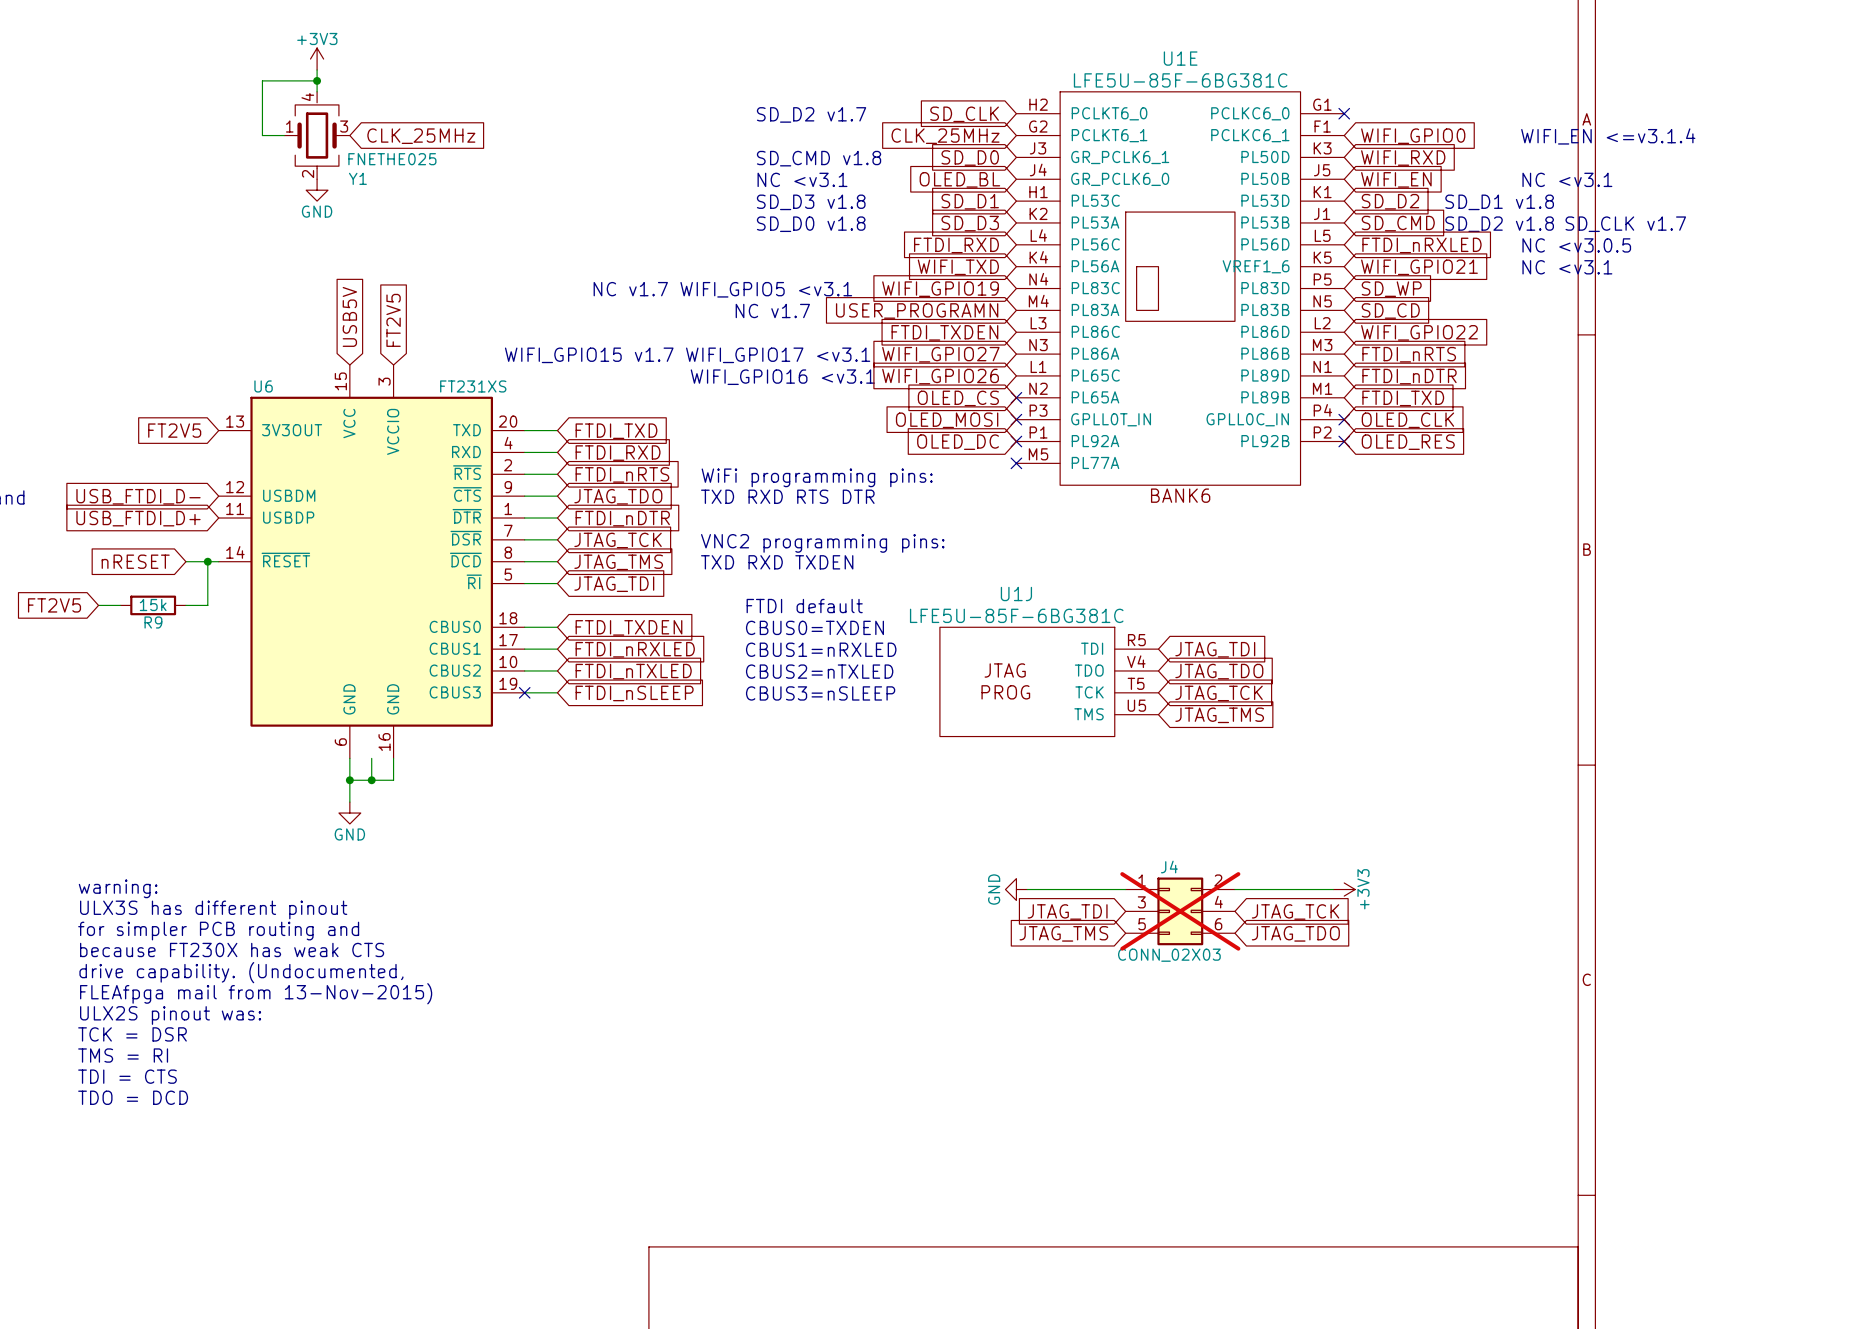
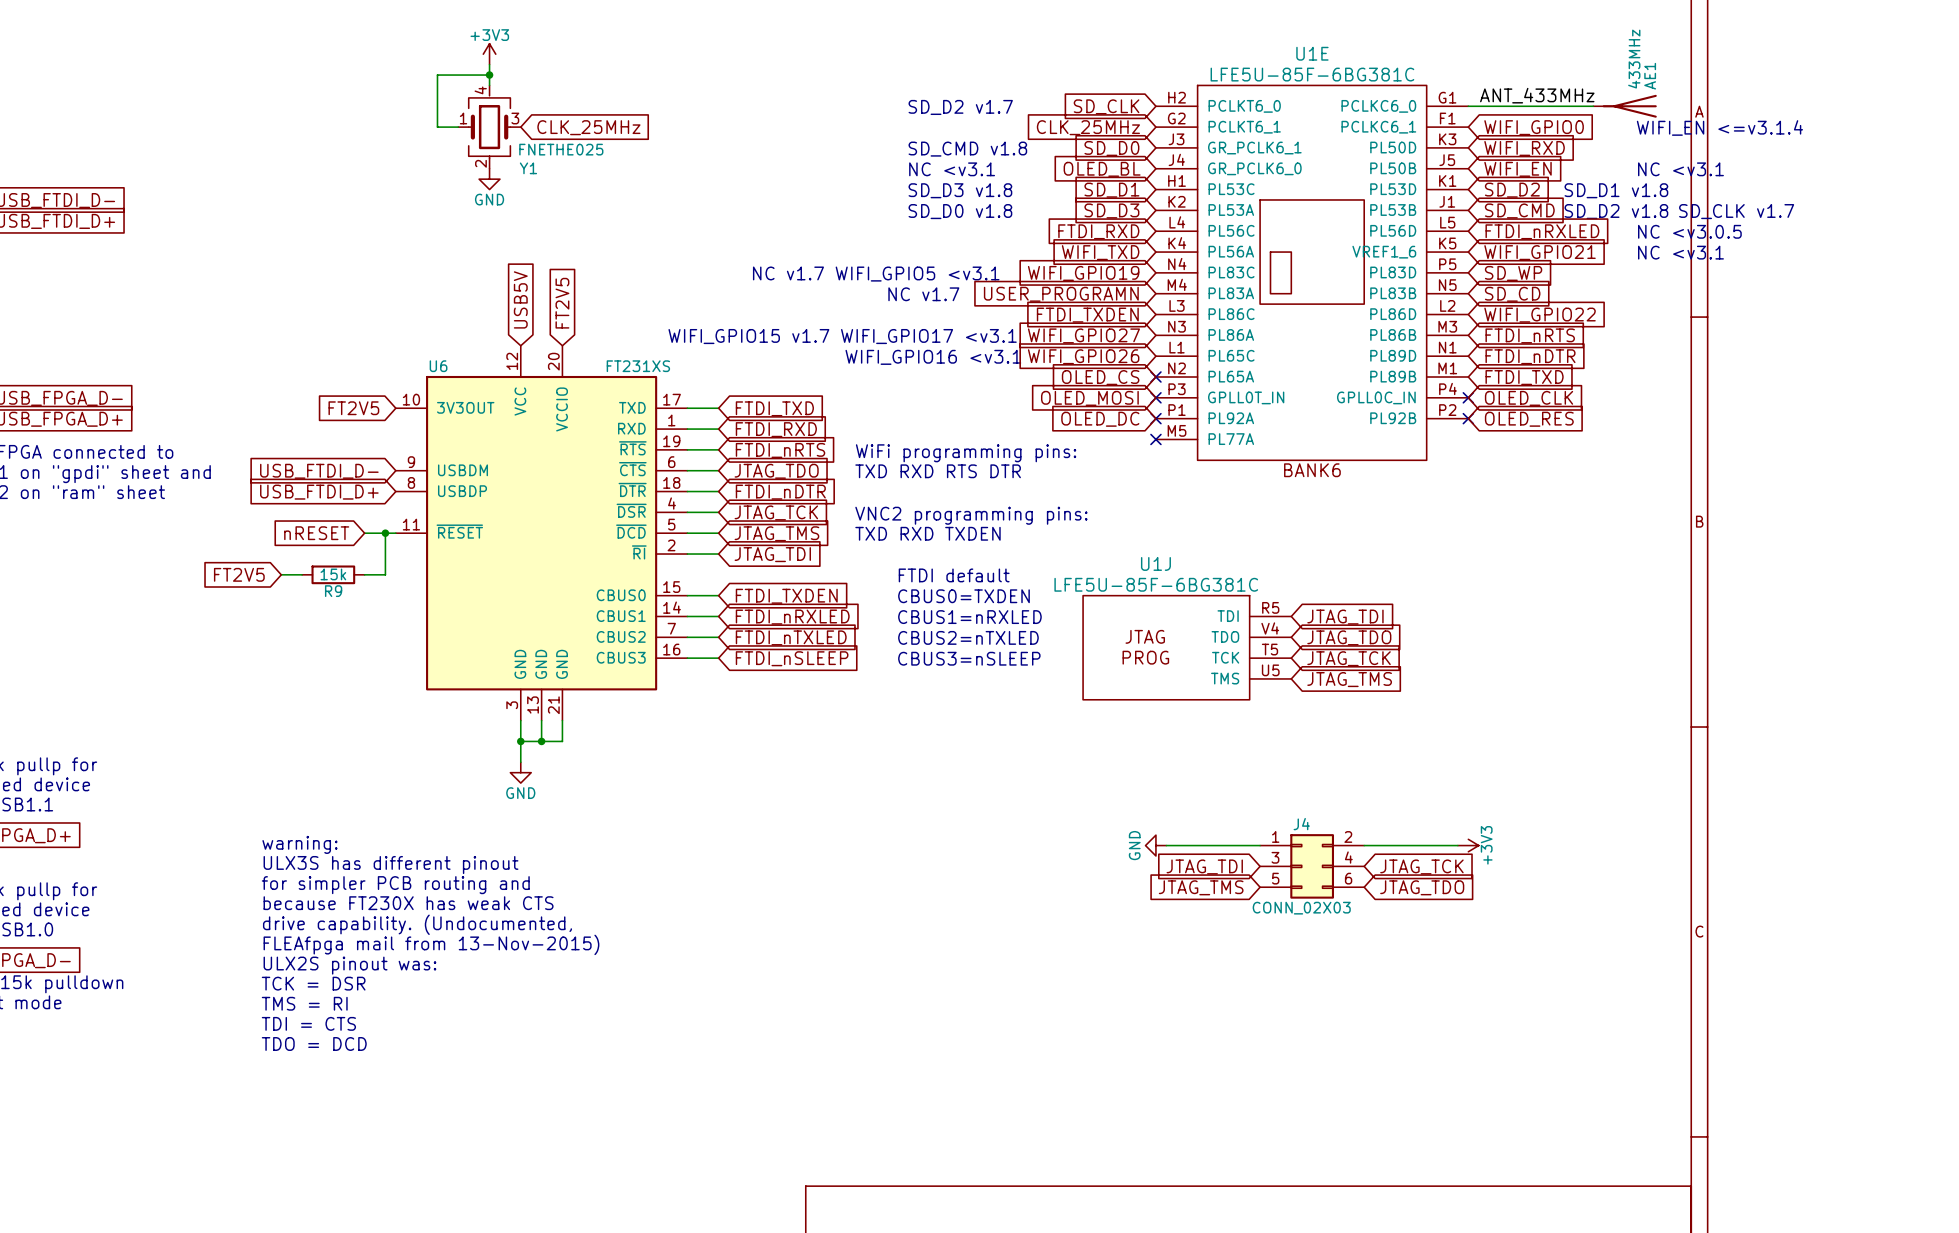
label: none -> ANT_433MHz (1537, 95)
wire: none -> (1468, 106) (1593, 106)
no-connect mark: (1344, 113) -> none
AE1: none -> 433MHz (1625, 106)
U6 symbol: [218, 365, 525, 759] -> [395, 345, 688, 721]
no-connect mark: (524, 692) -> none
J4 do-not-place cross: (1180, 911) -> none

